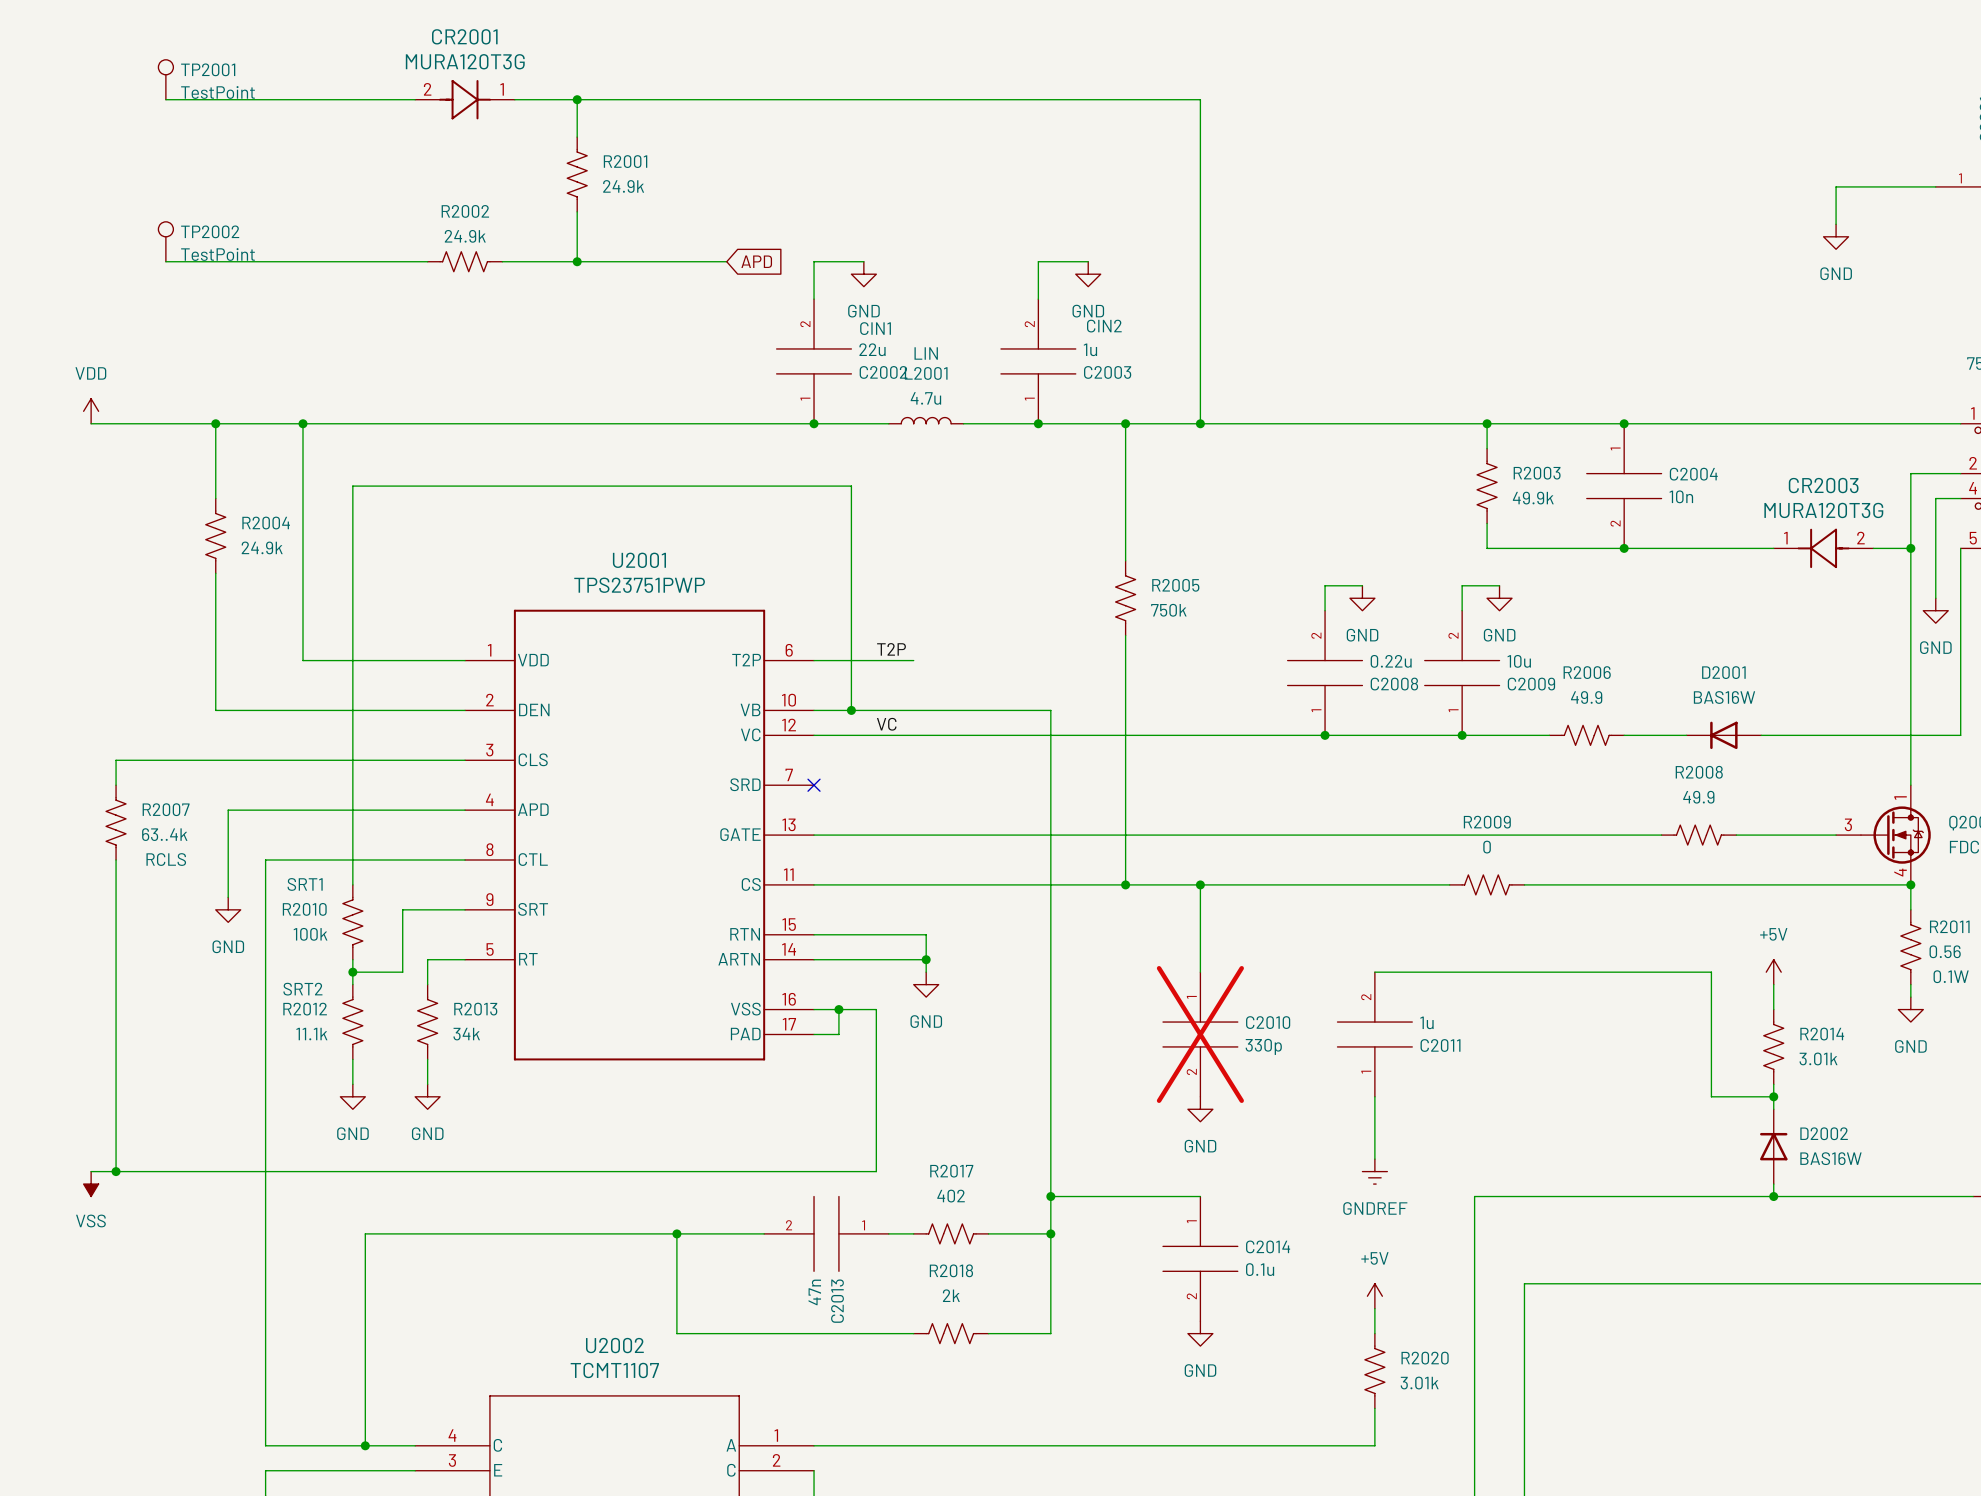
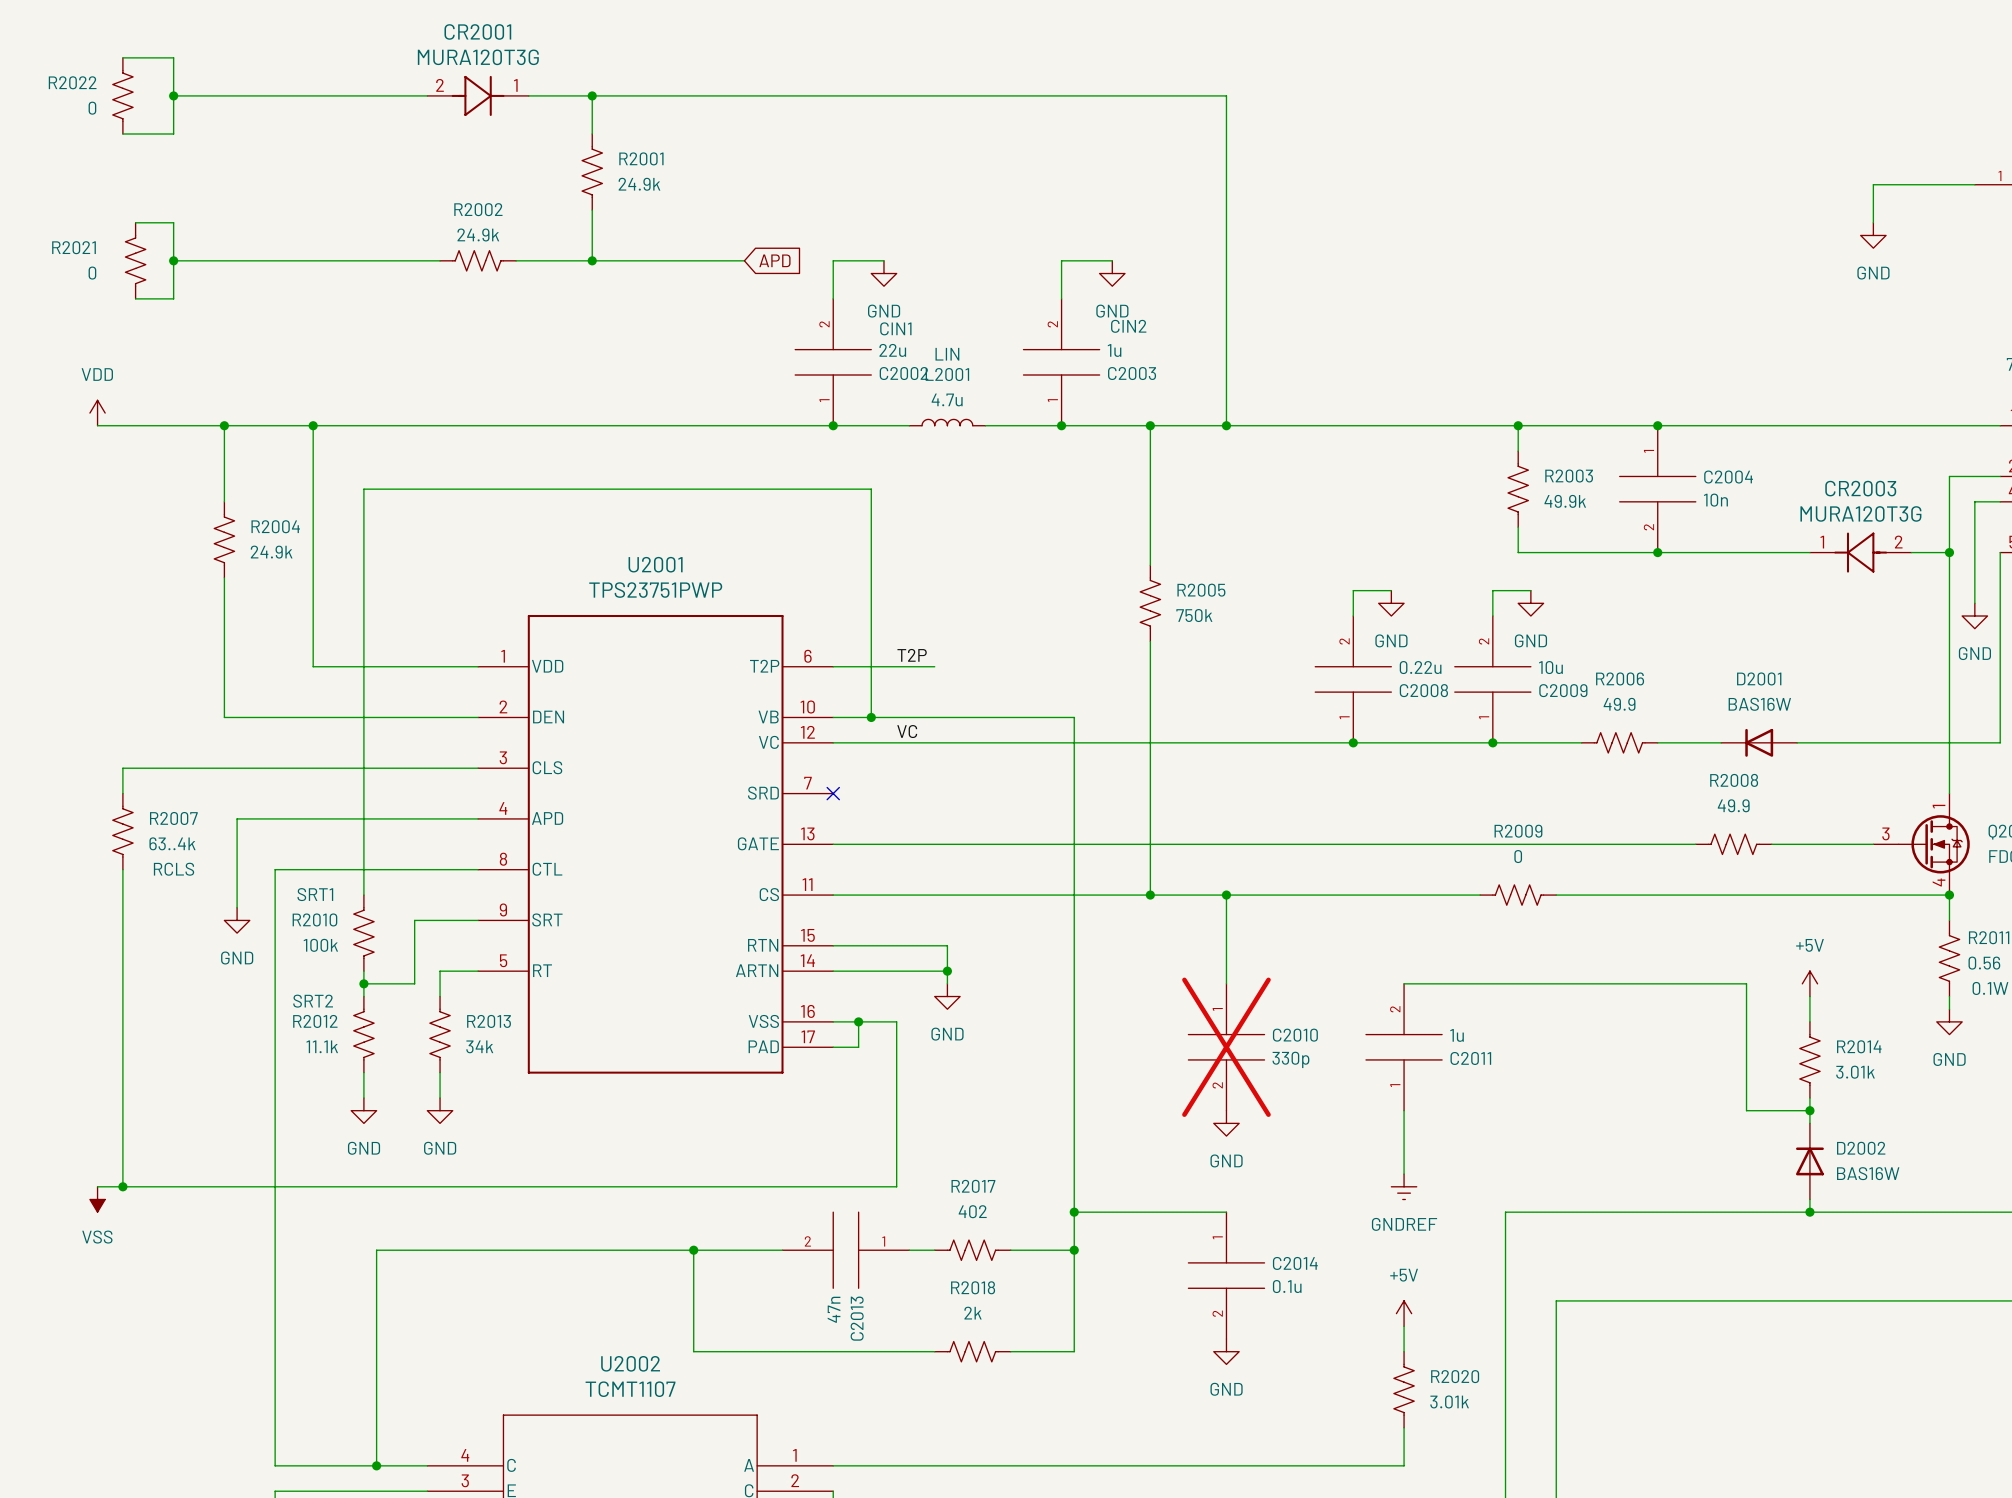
wire: none -> (122, 57) (173, 57) (173, 133) (122, 133)
TP2001: TestPoint (165, 79) -> none
R2022: none -> 0 (122, 95)
junction: none -> (173, 95)
wire: none -> (135, 222) (173, 222) (173, 298) (135, 298)
TP2002: TestPoint (165, 241) -> none
R2021: none -> 0 (135, 260)
junction: none -> (173, 260)

